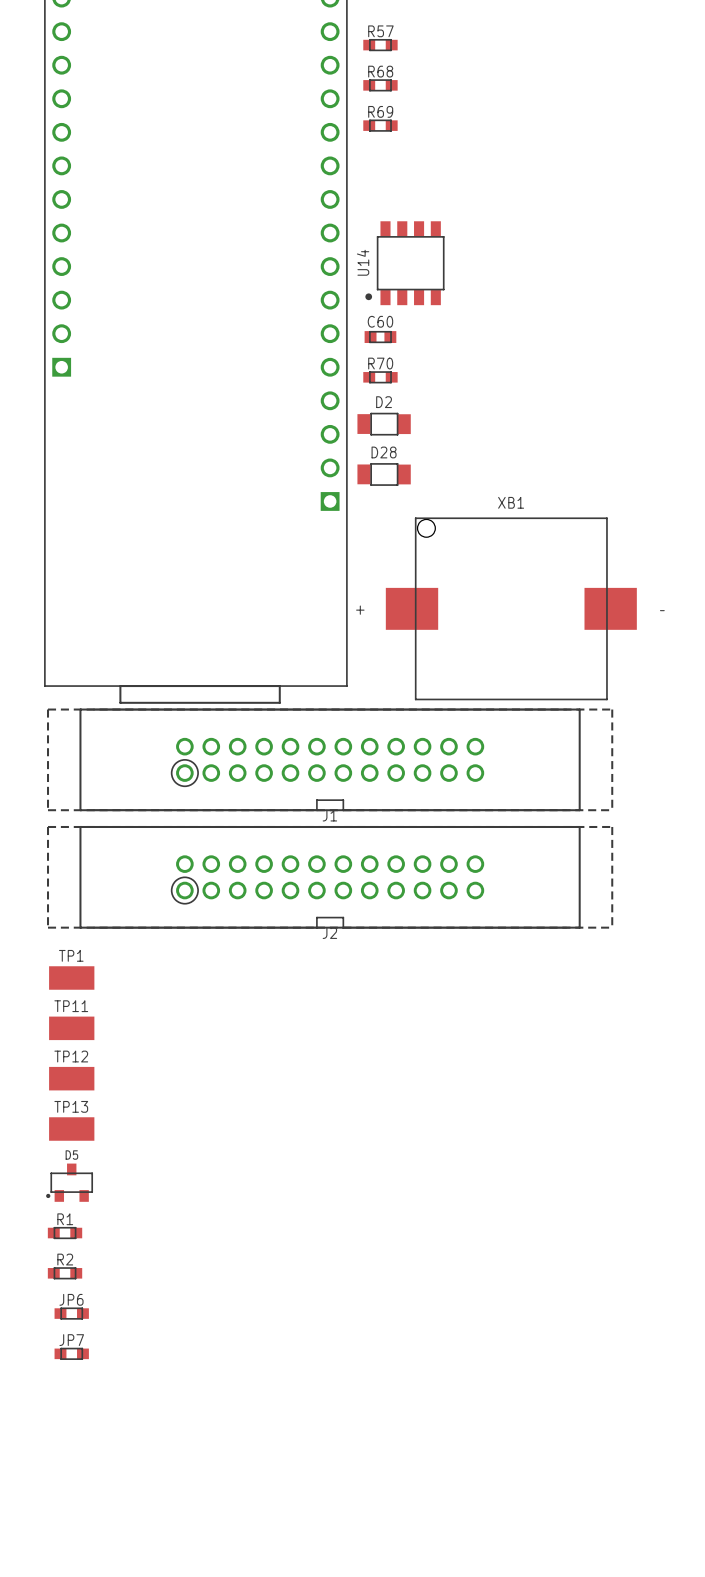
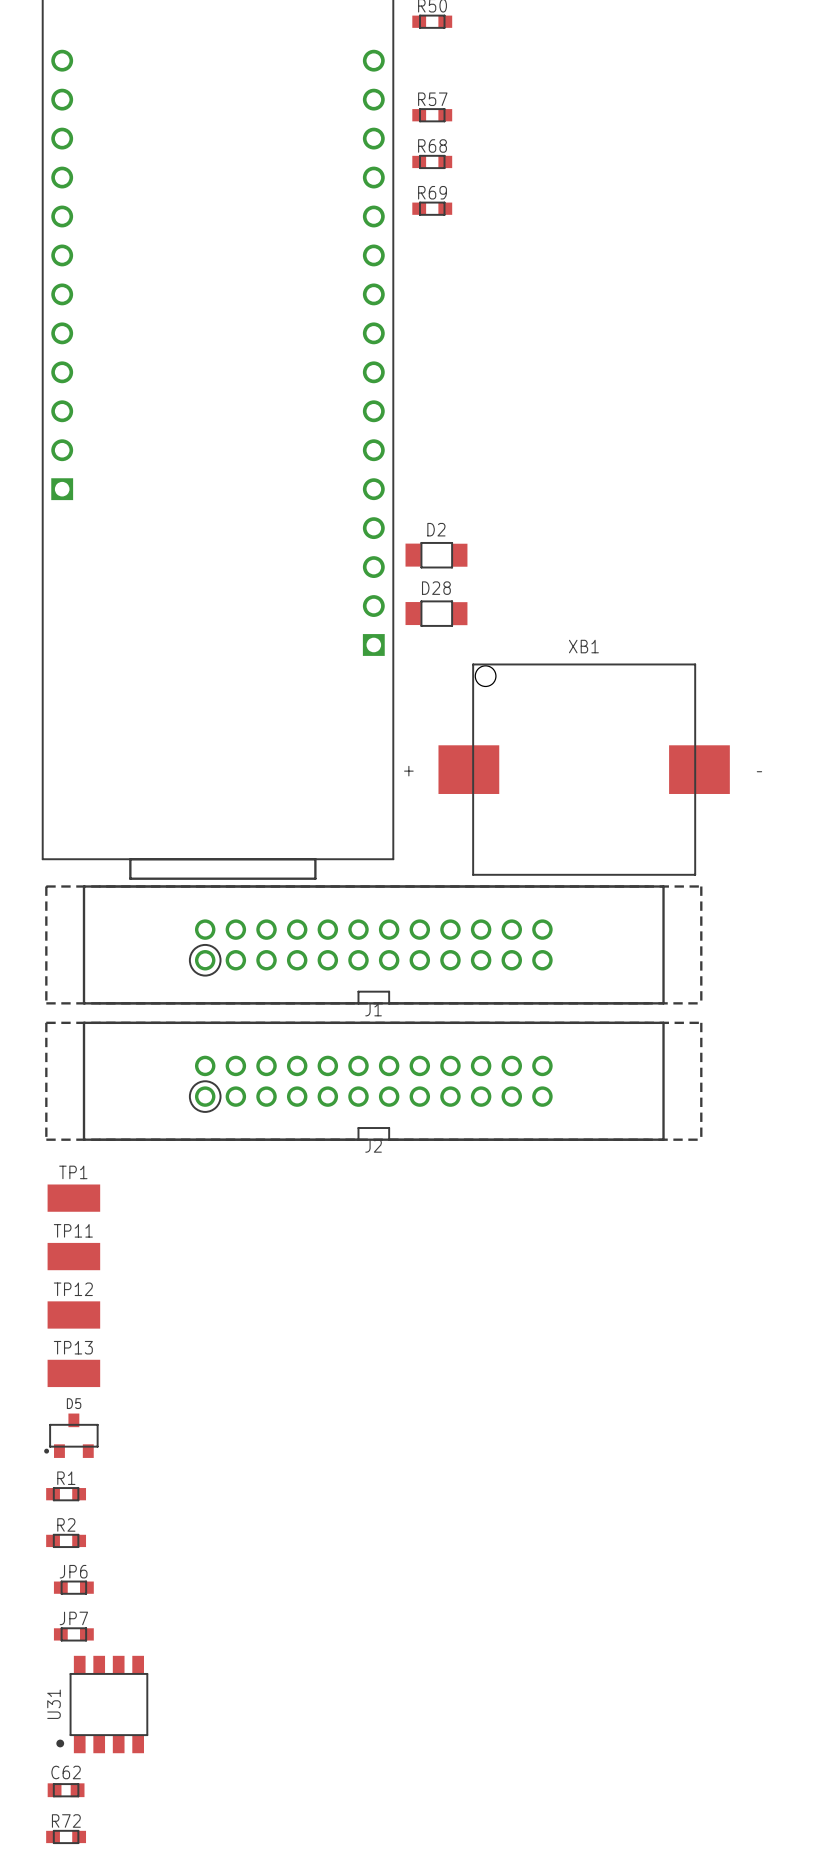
U14: (404, 263) -> none
C60: (380, 337) -> none
R70: (380, 377) -> none
U31: none -> (102, 1704)
C62: none -> (66, 1790)
R72: none -> (66, 1836)

